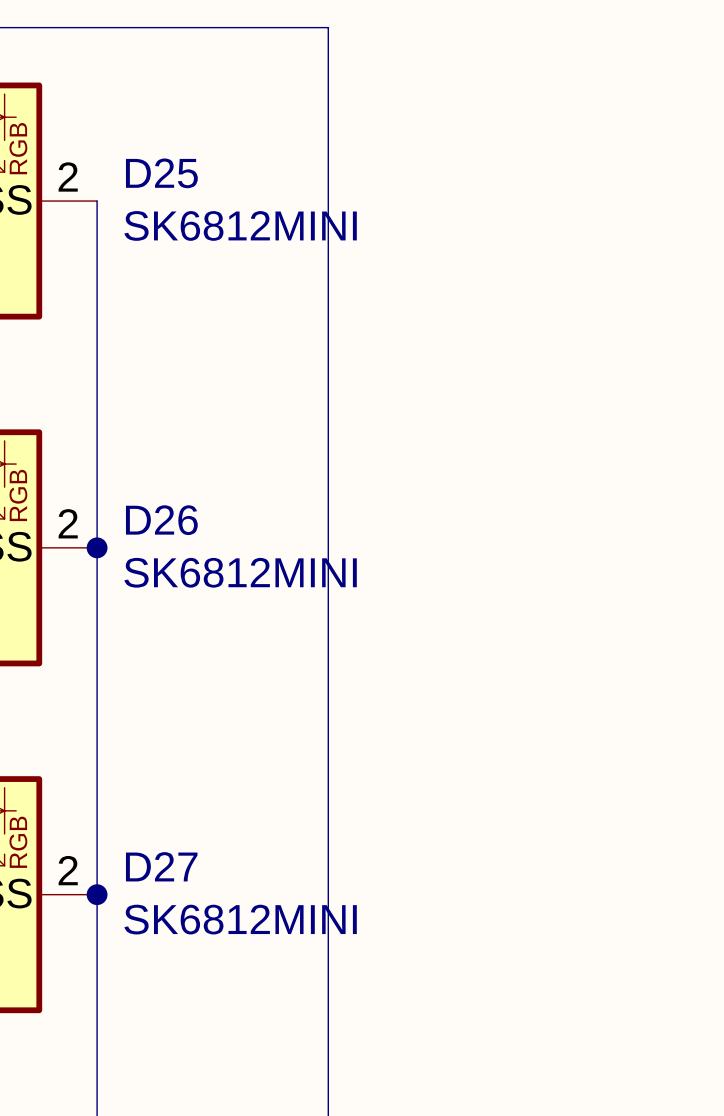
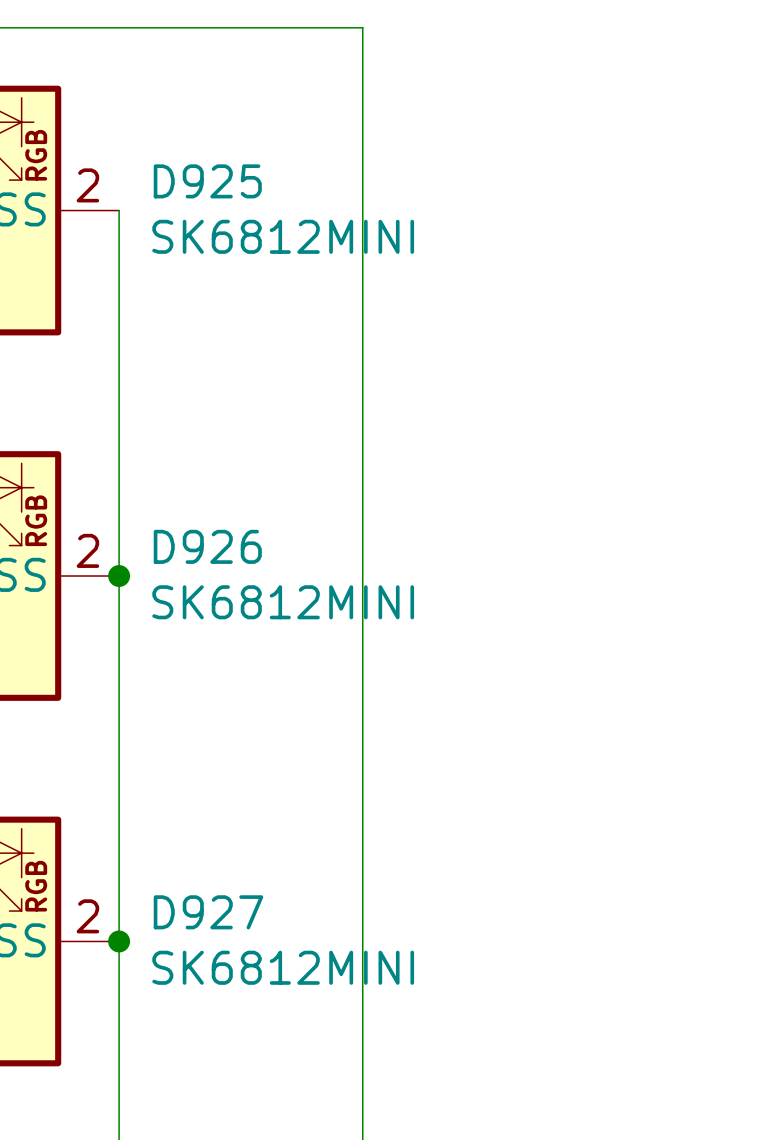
D25 name: D25 (161, 173) -> D925 (207, 181)
D26 name: D26 (161, 520) -> D926 (207, 546)
D27 name: D27 (161, 866) -> D927 (208, 912)

